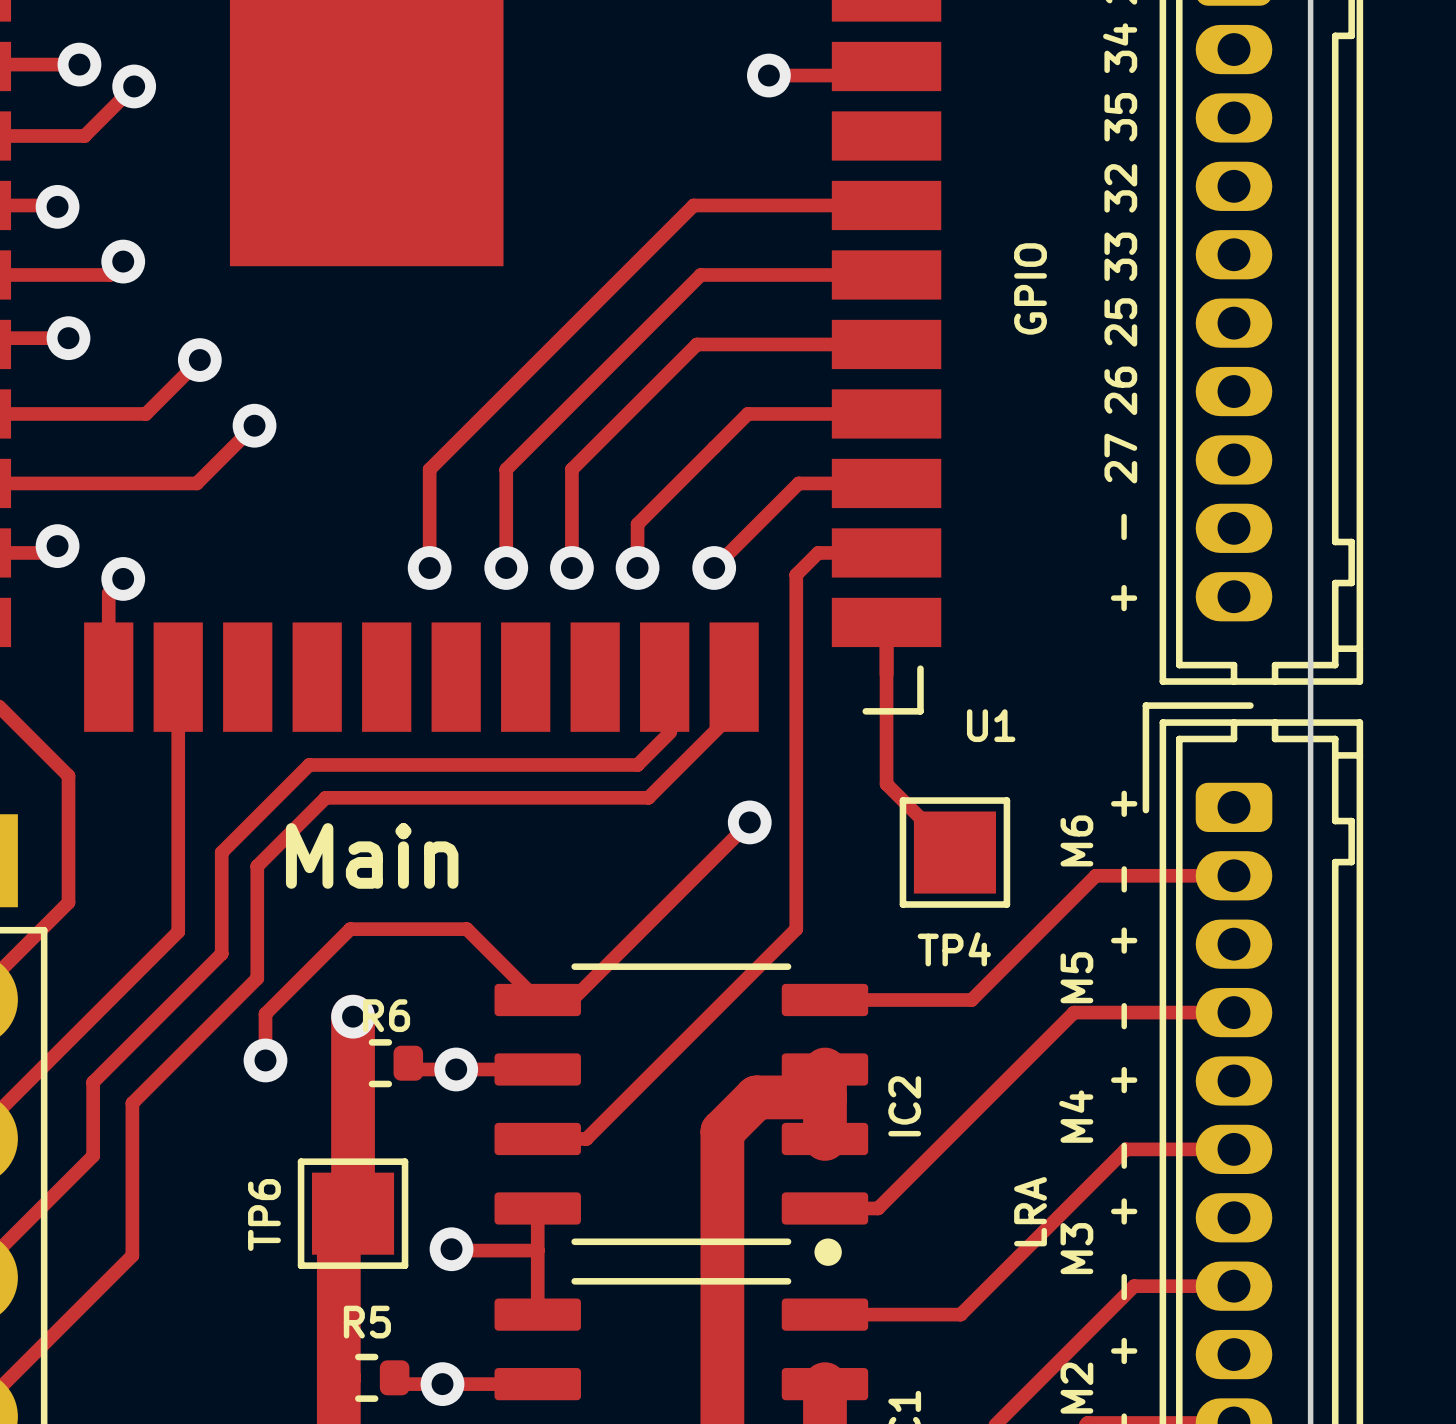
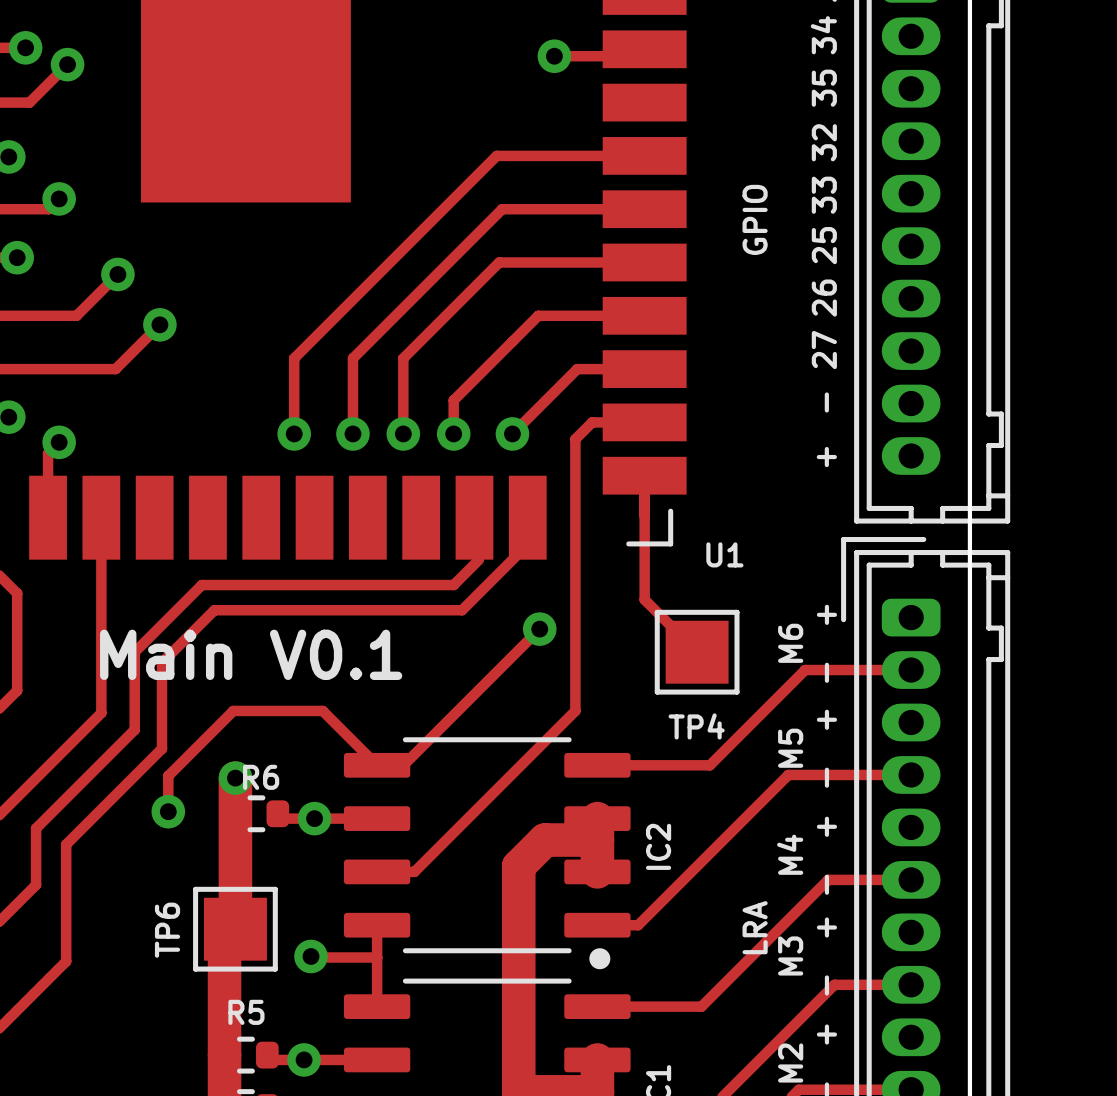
text: Main (372, 855) -> Main V0.1 (251, 654)

